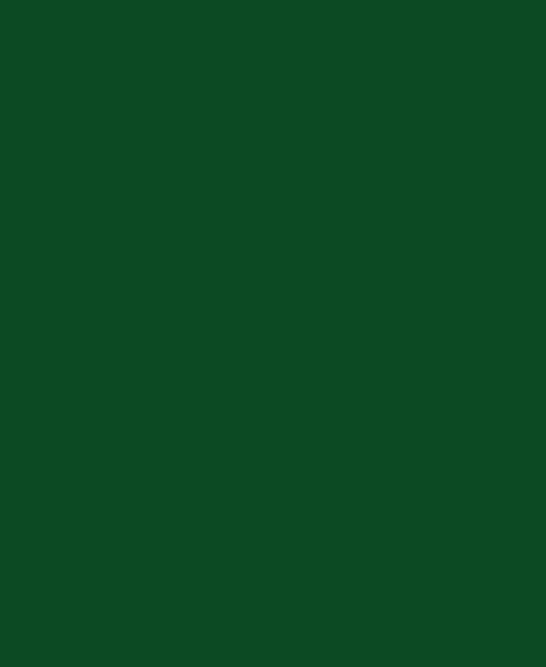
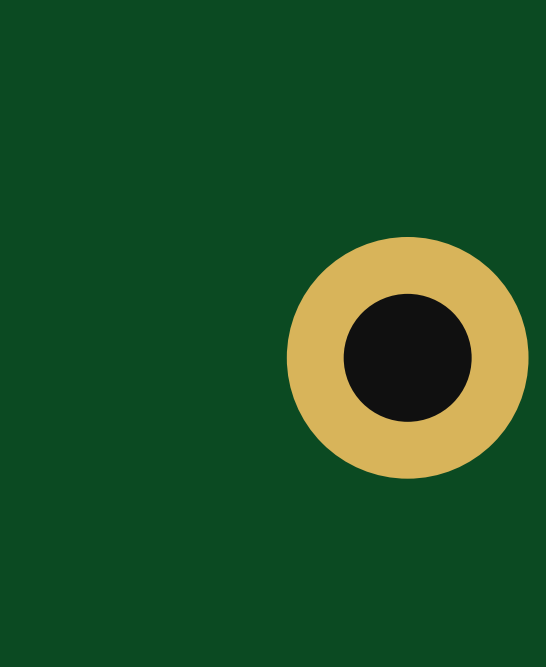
part: none -> (407, 357)

